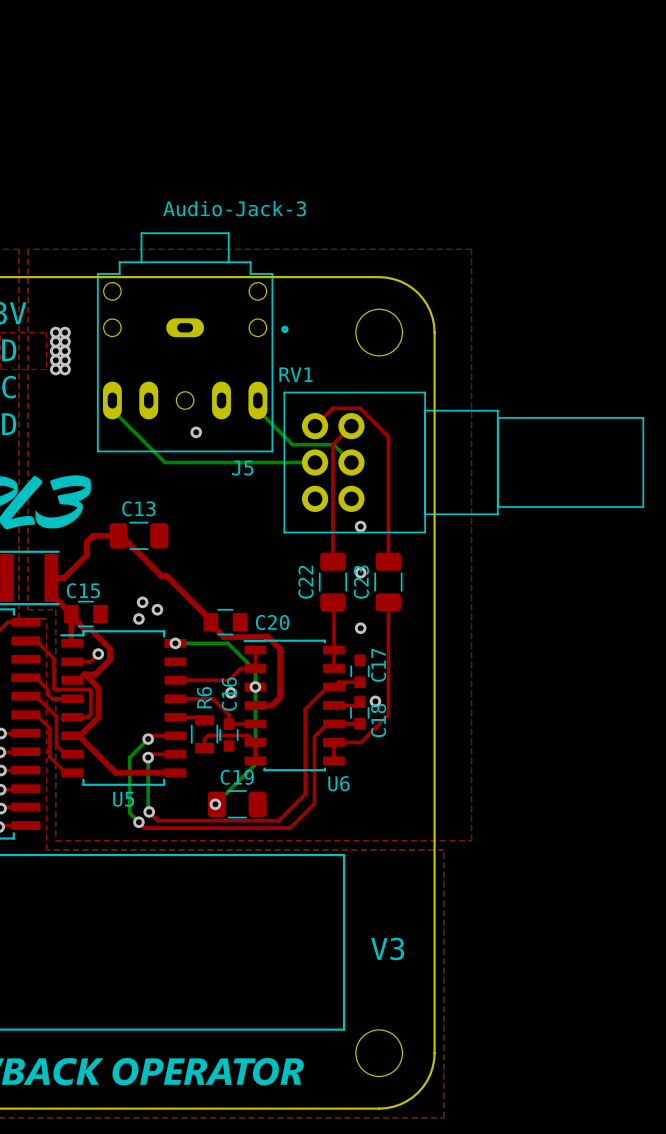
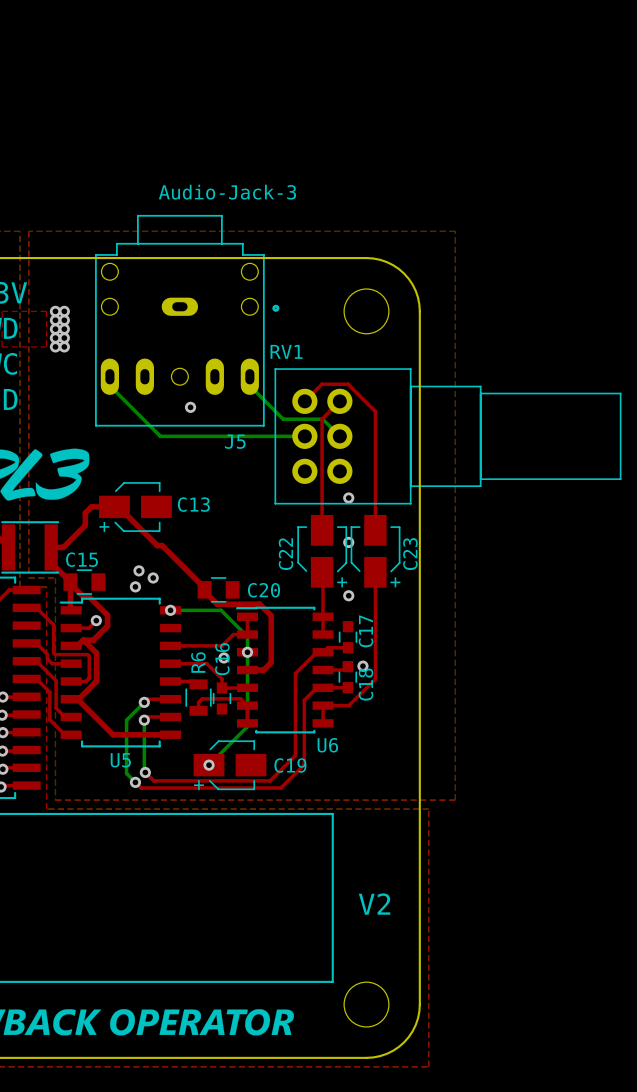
C13 name position: C13 (138, 508) -> C13 (193, 504)
C13 footprint: [109, 521, 169, 550] -> [99, 482, 172, 532]
C22 footprint: [318, 552, 348, 612] -> [297, 514, 348, 588]
C23 footprint: [374, 552, 403, 612] -> [350, 514, 401, 588]
C23 name position: C23 (361, 582) -> C23 (410, 554)
C19 name position: C19 (237, 777) -> C19 (290, 765)
C19 footprint: [207, 790, 267, 819] -> [193, 740, 267, 791]
text: V3 (387, 948) -> V2 (374, 904)

